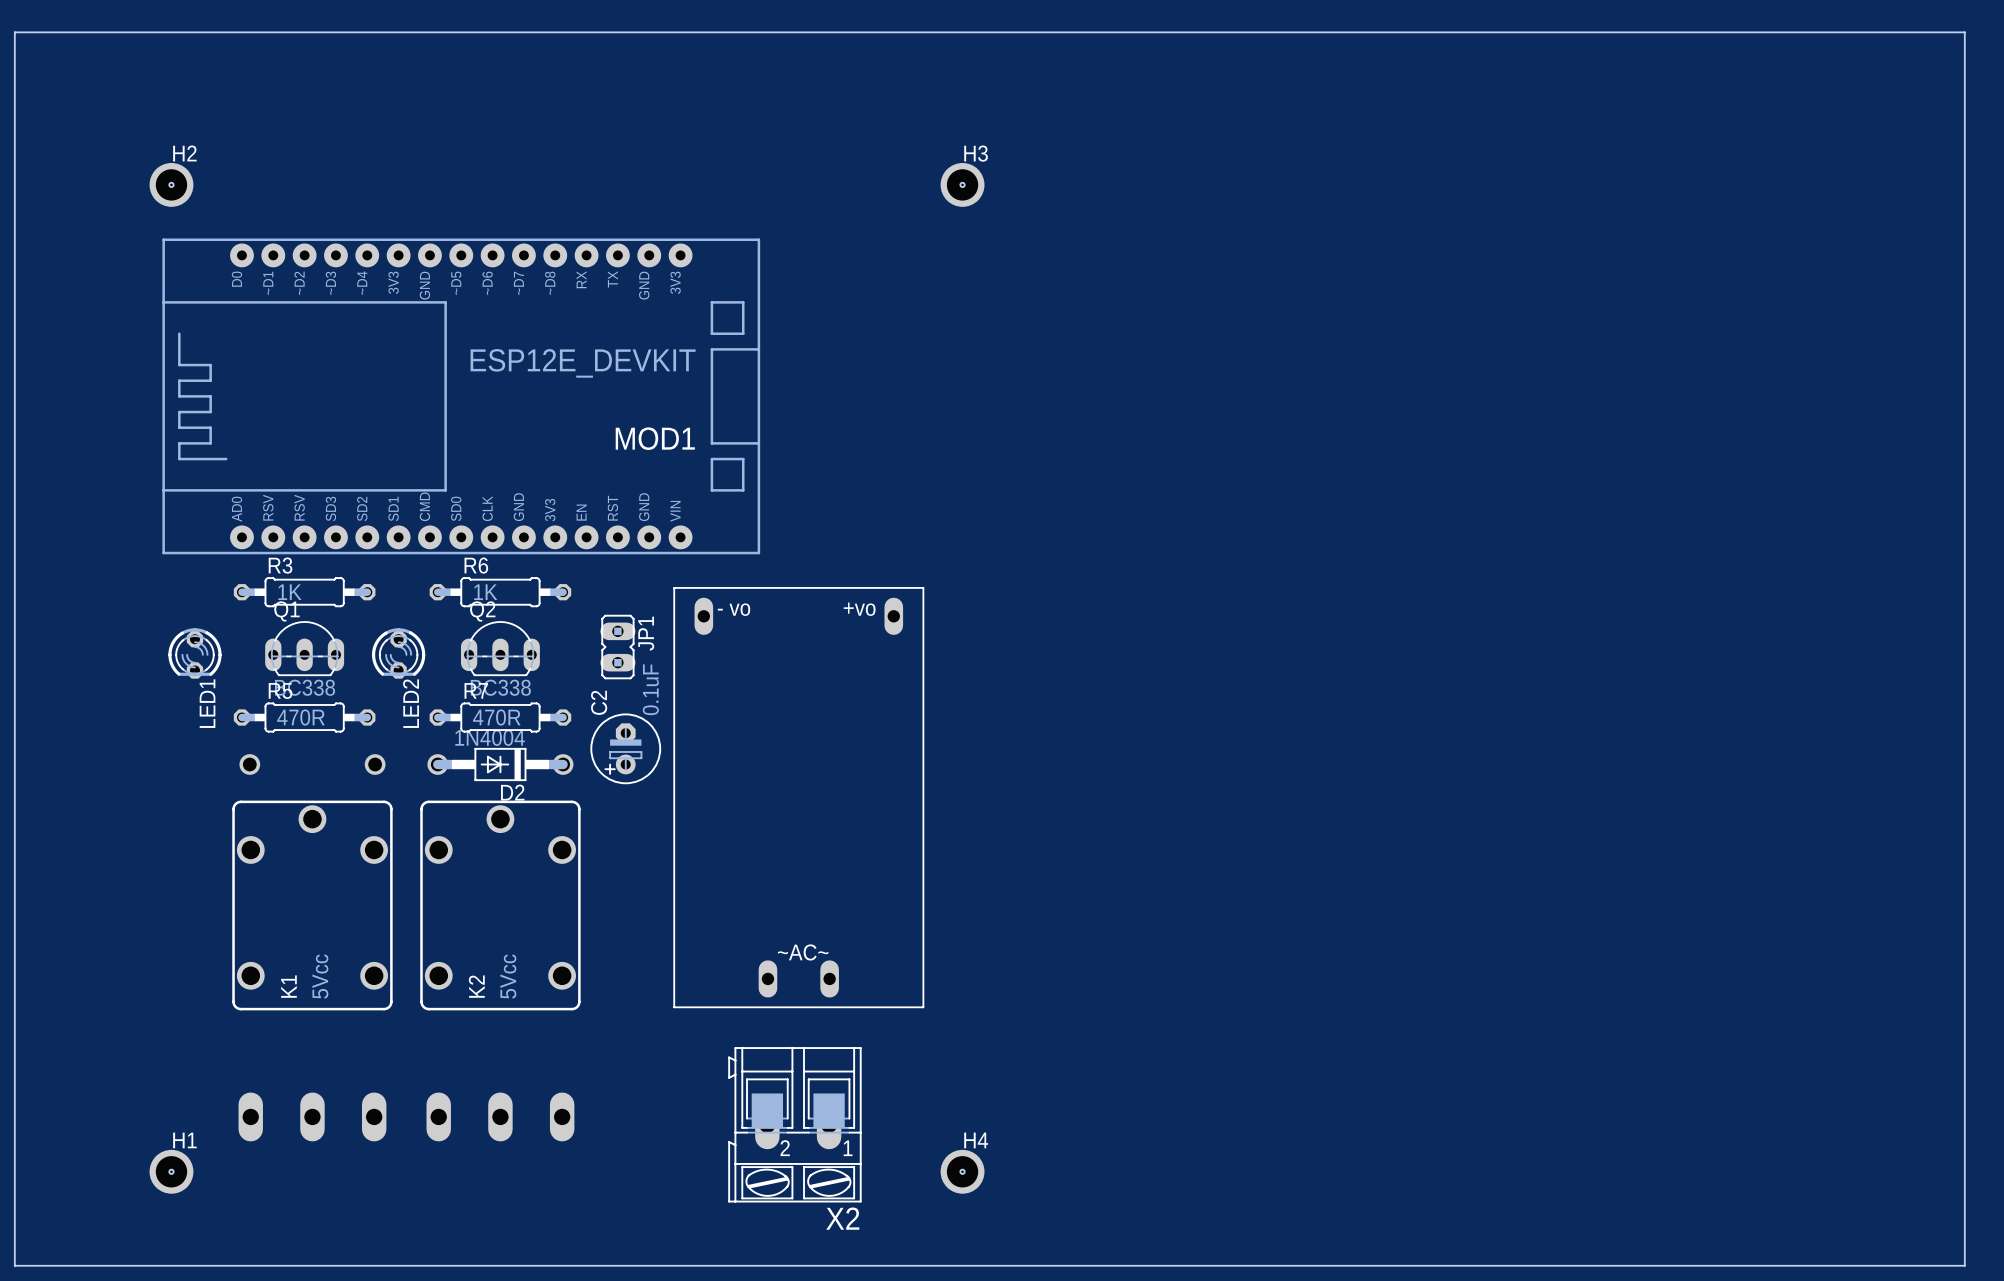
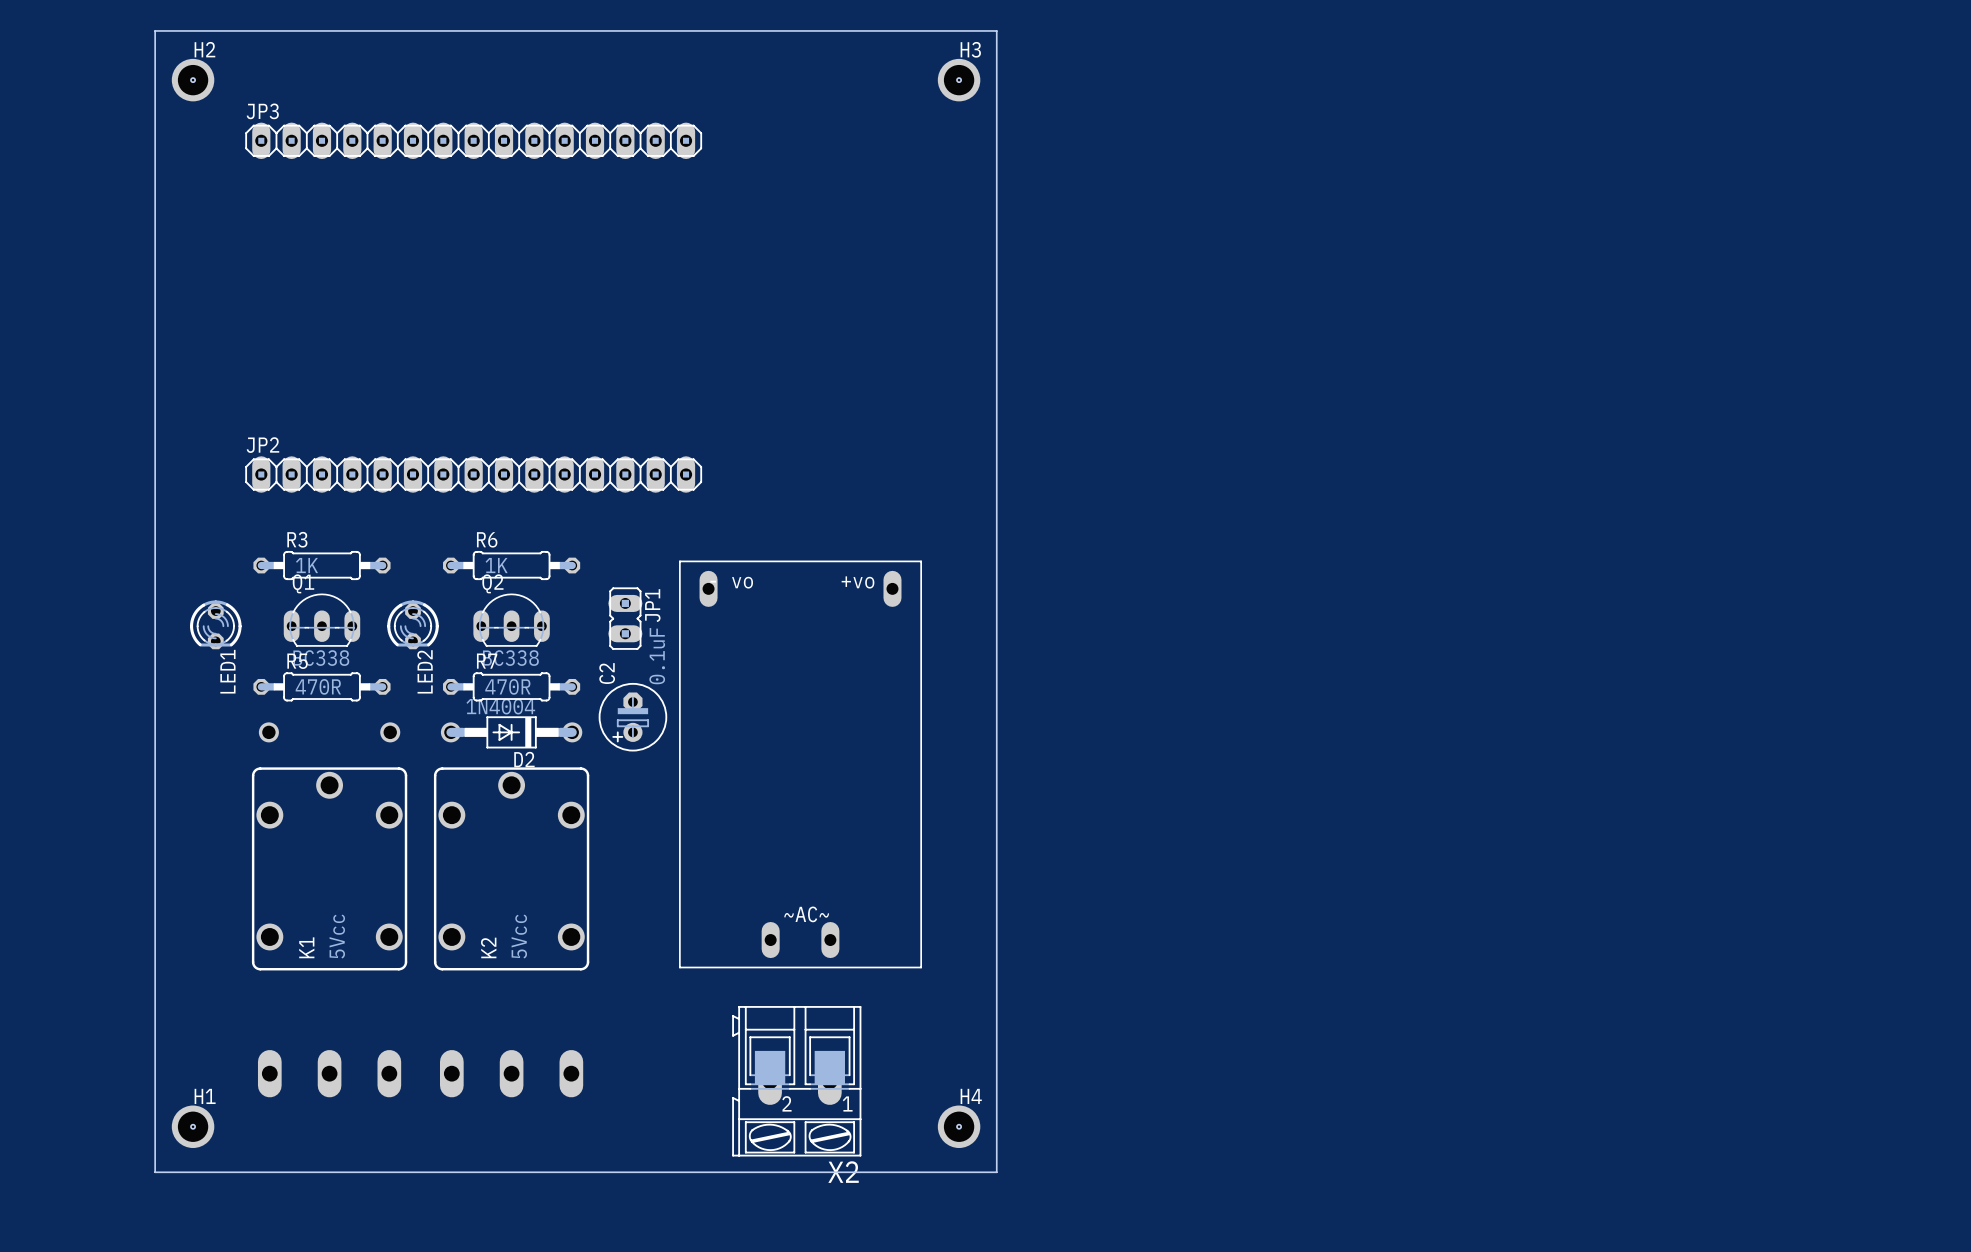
board edge: (14, 32) (1964, 32) (1964, 1265) (14, 1265) (14, 32) -> none
board edge: none -> (155, 30) (996, 30) (996, 1172) (155, 1172) (155, 30)
JP3: none -> (473, 140)
hole position: (171, 184) -> (193, 80)
H2 position: (171, 184) -> (193, 80)
hole position: (962, 184) -> (959, 80)
H3 position: (962, 184) -> (959, 80)
MOD1: ESP12E_DEVKIT (461, 396) -> none
JP2: none -> (473, 474)

